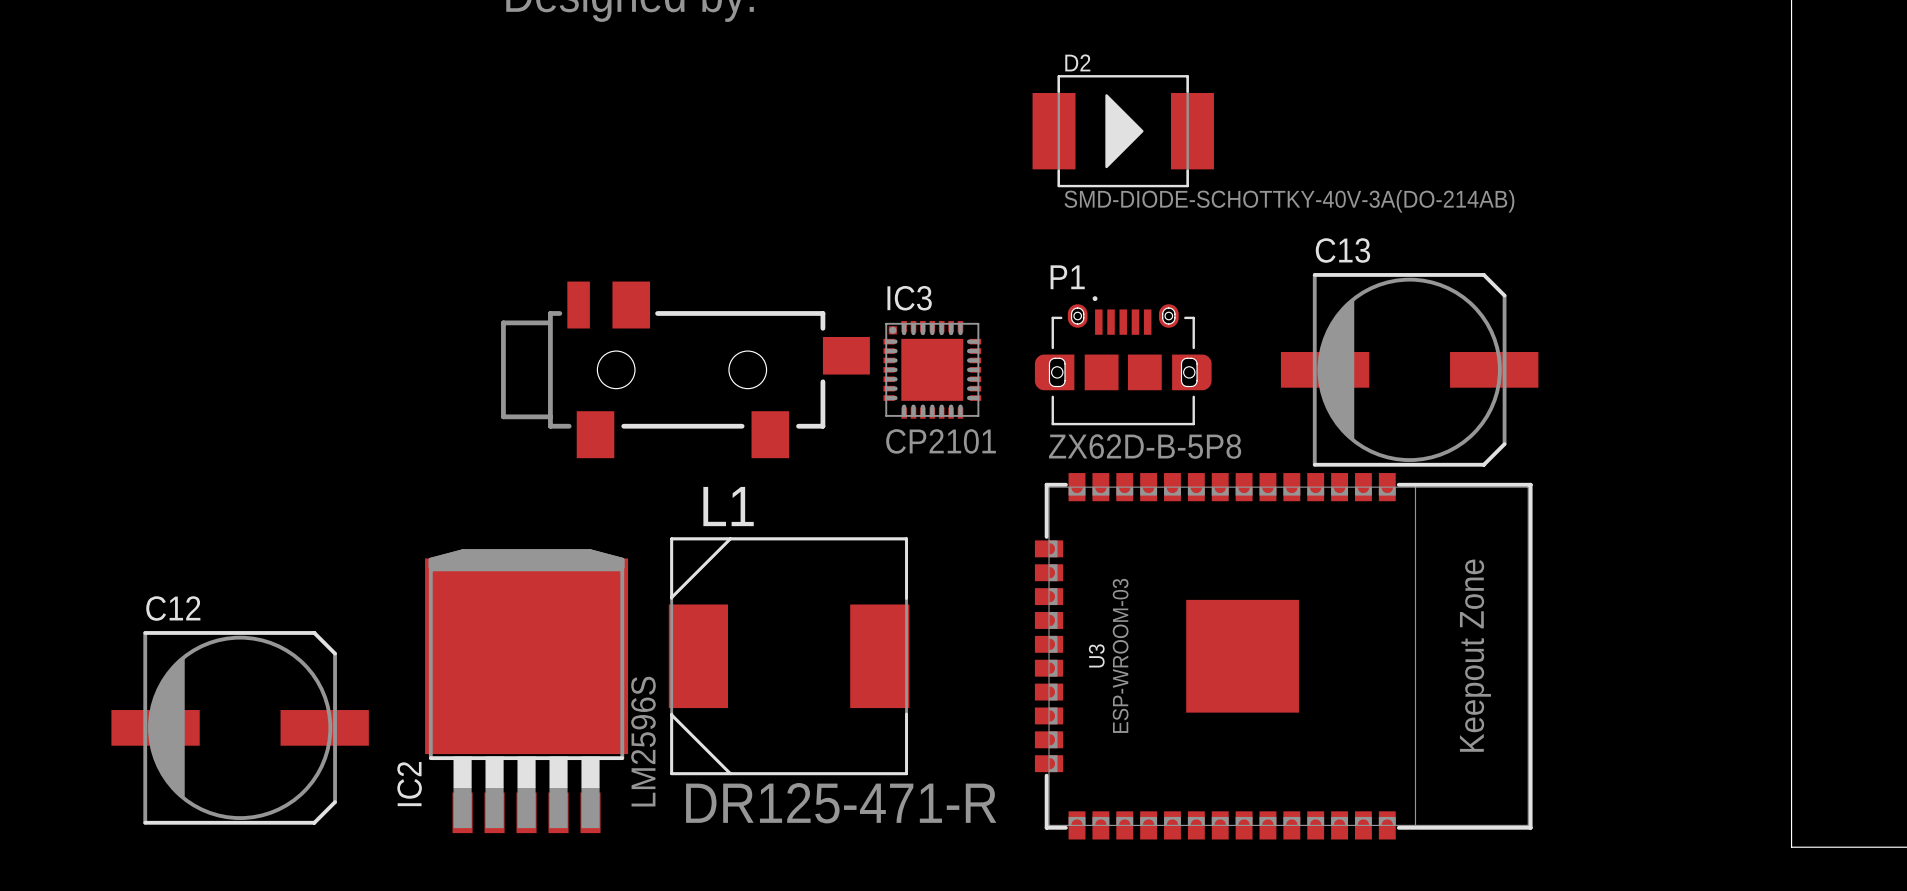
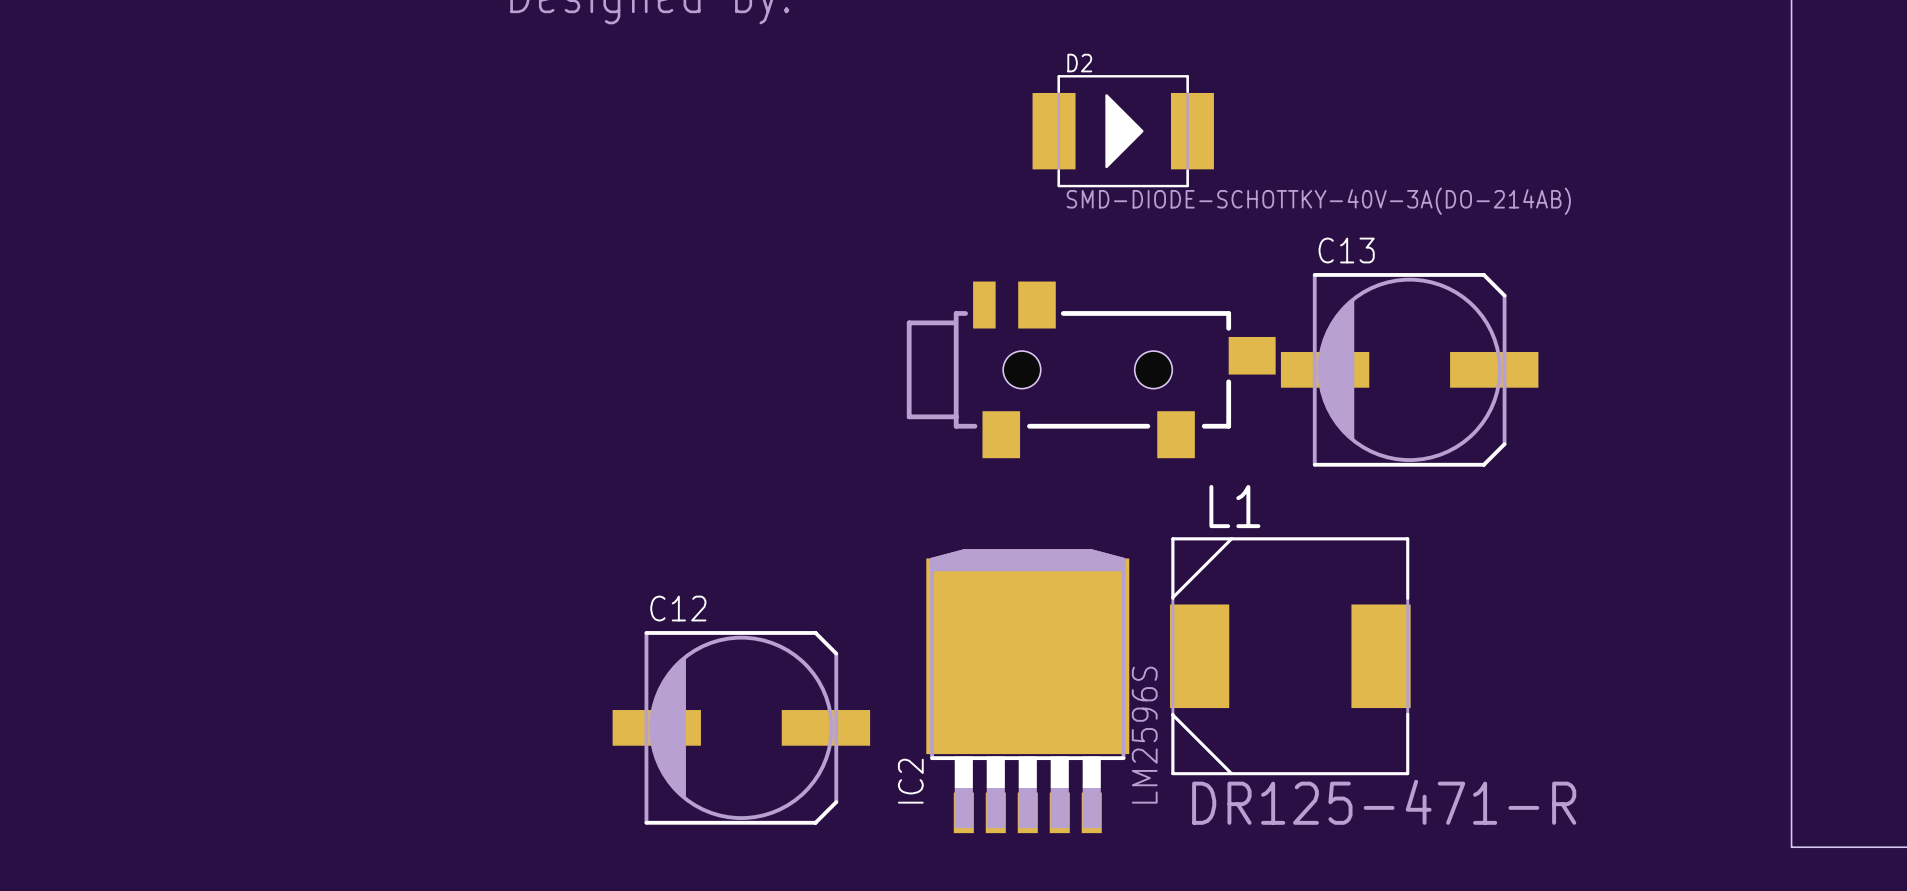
P1: ZX62D-B-5P8 (1123, 360) -> none
part position: (685, 369) -> (1091, 369)
IC3: CP2101 (932, 369) -> none
L1 position: (789, 656) -> (1290, 656)
U3: ESP-WROOM-03 (1283, 656) -> none
IC2 position: (526, 691) -> (1027, 691)
C12 position: (240, 727) -> (741, 727)

